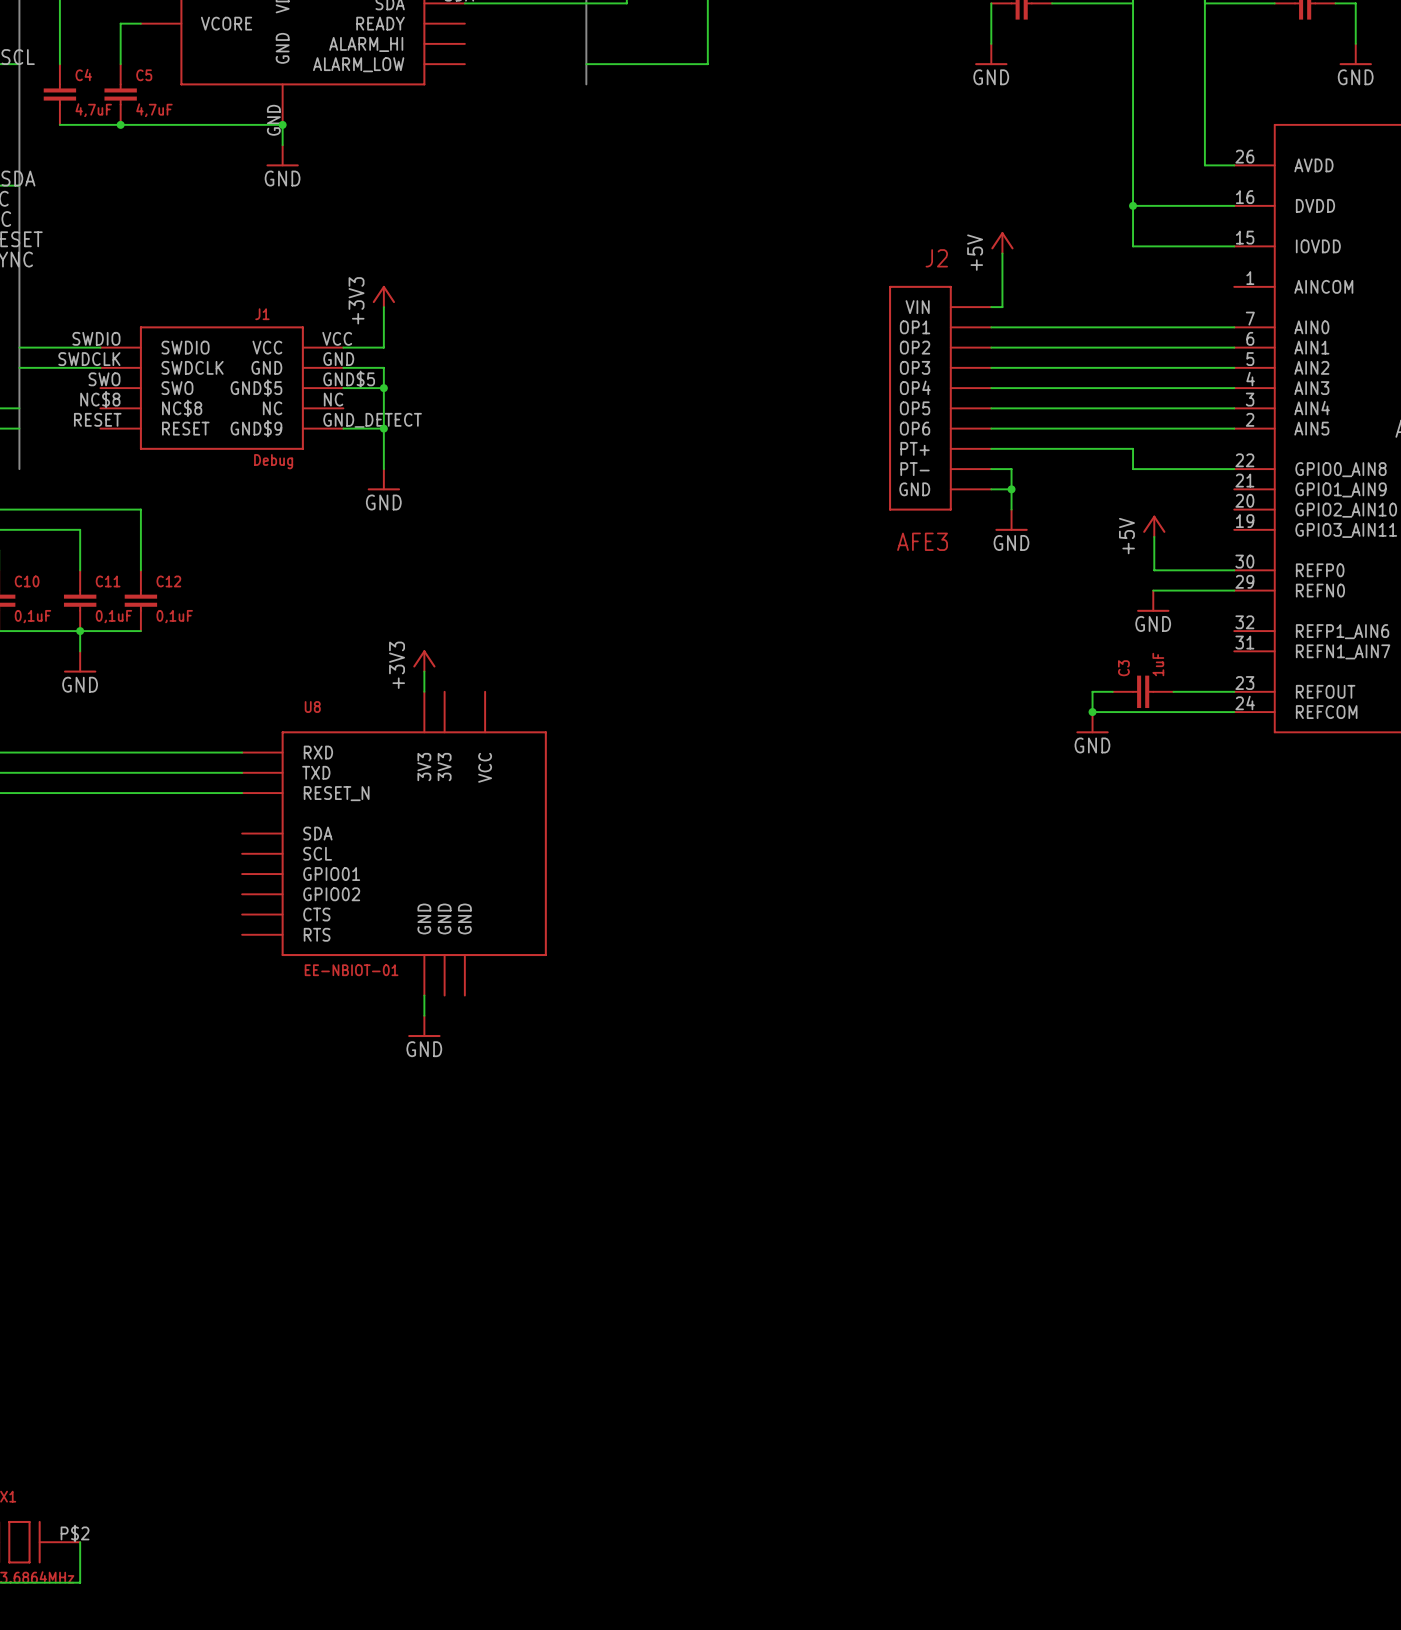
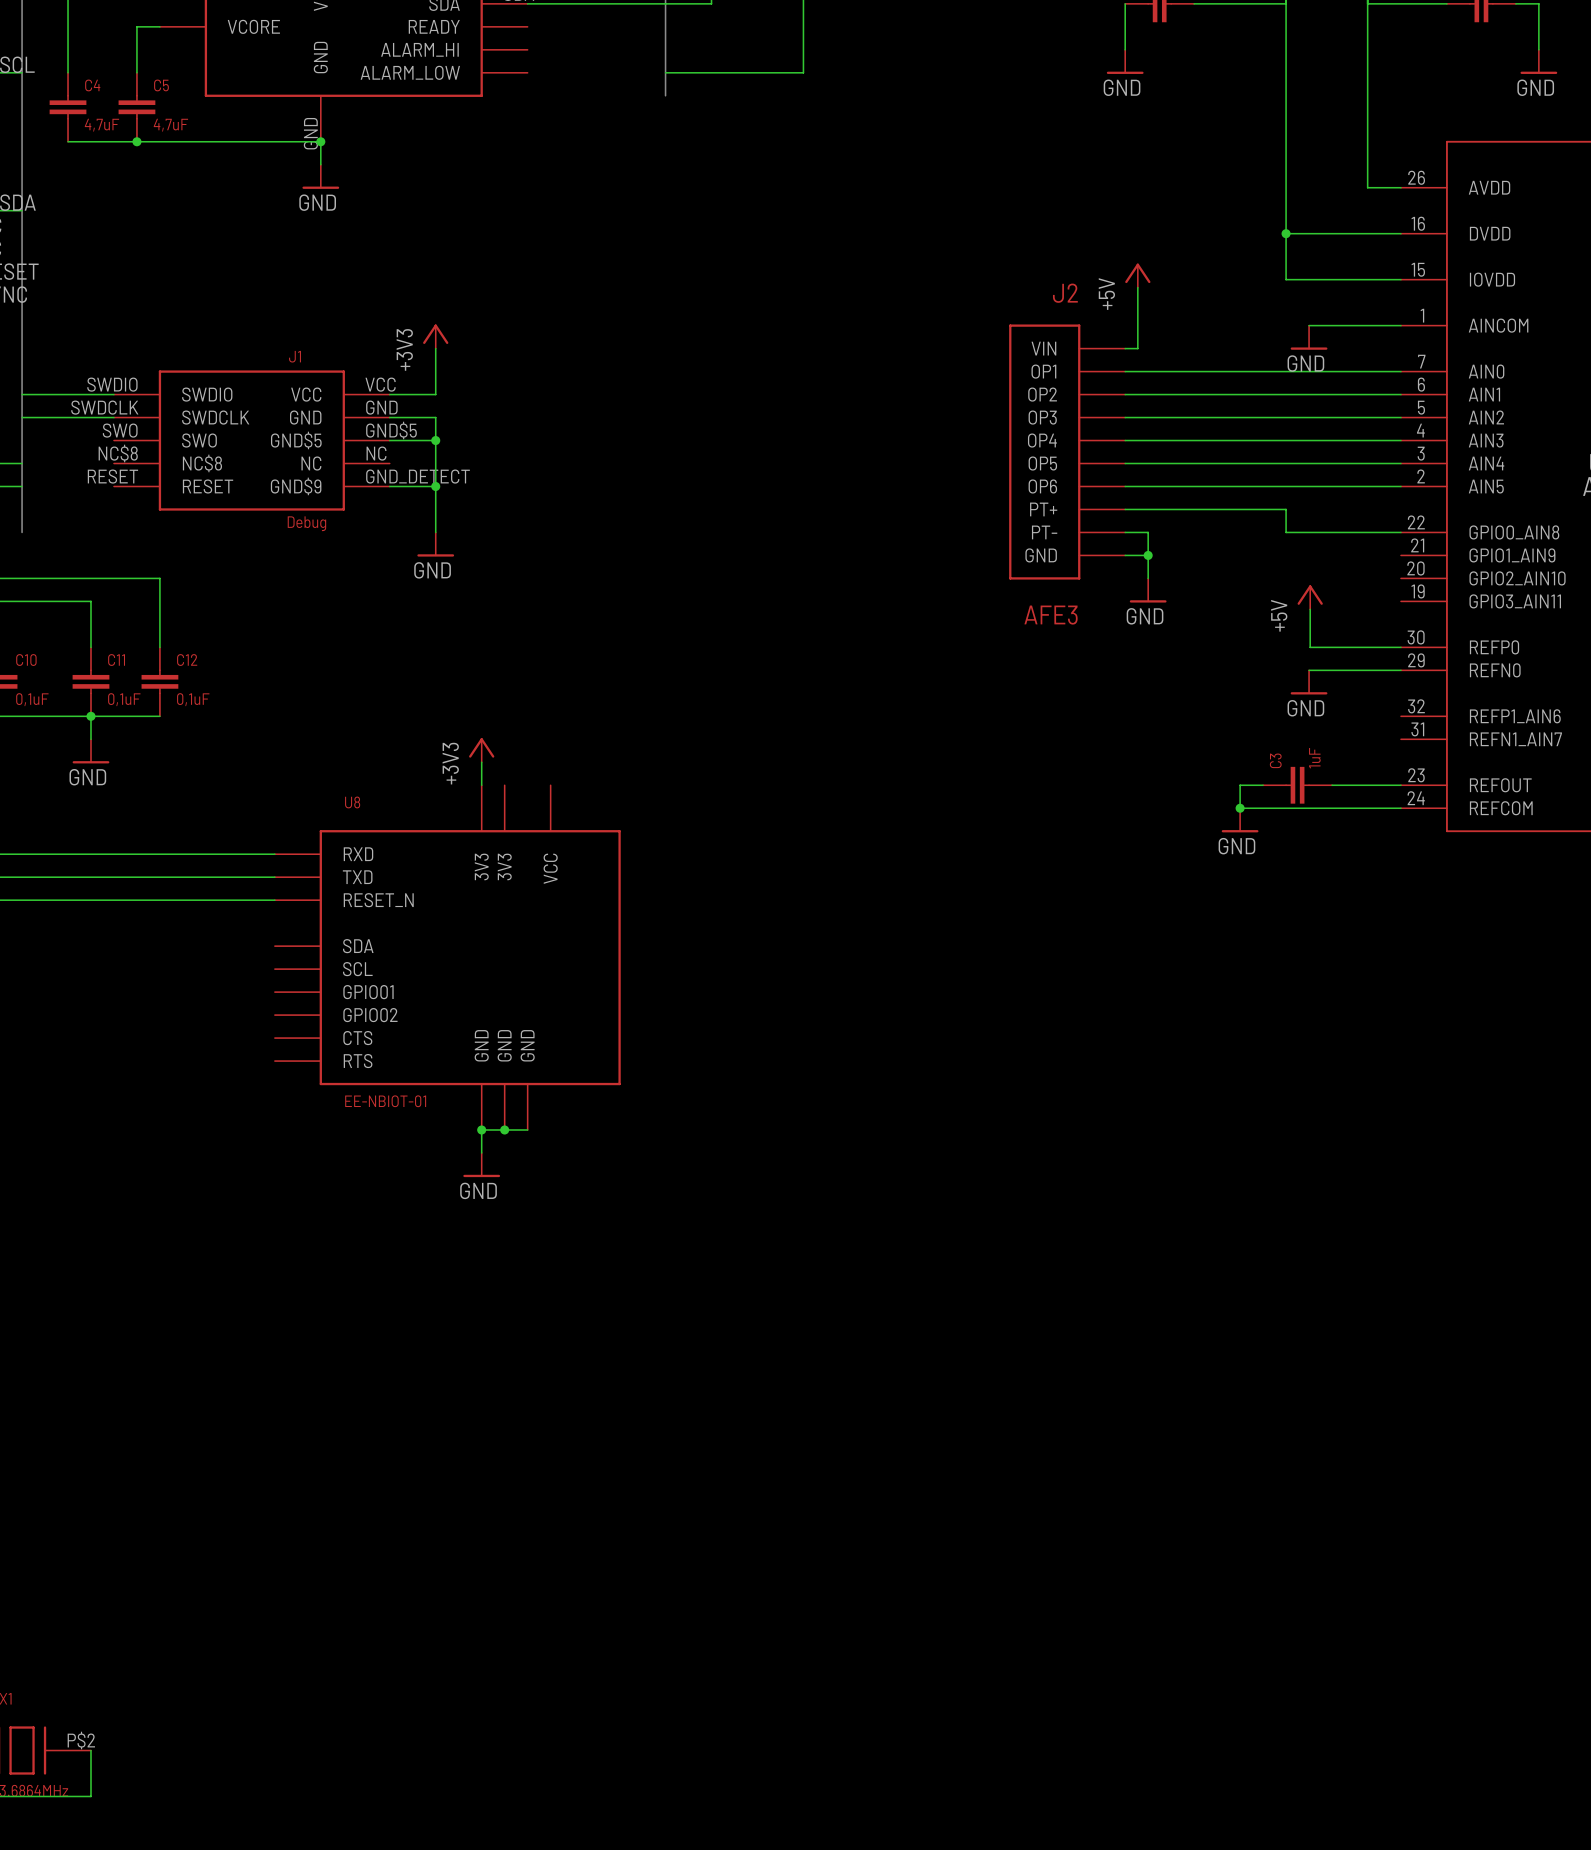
wire: none -> (1309, 325) (1400, 325)
power symbol: none -> GND (1309, 337)
wire: none -> (481, 1129) (527, 1129)
junction: none -> (481, 1129)
junction: none -> (504, 1129)

